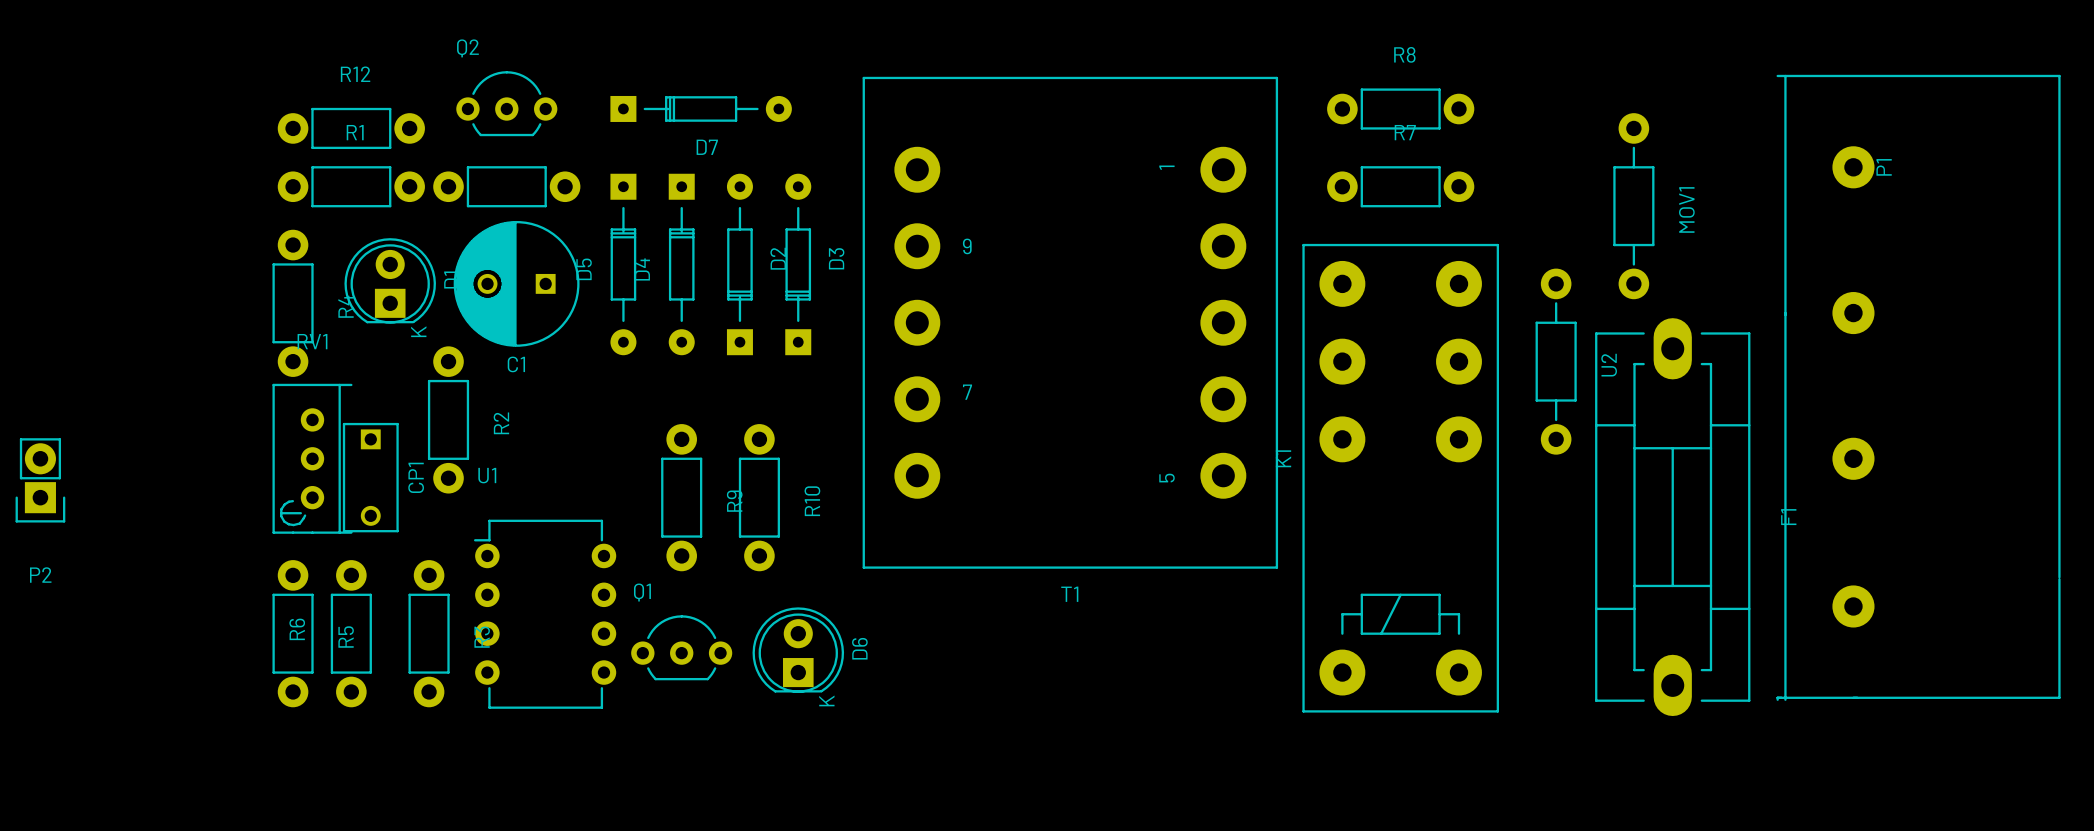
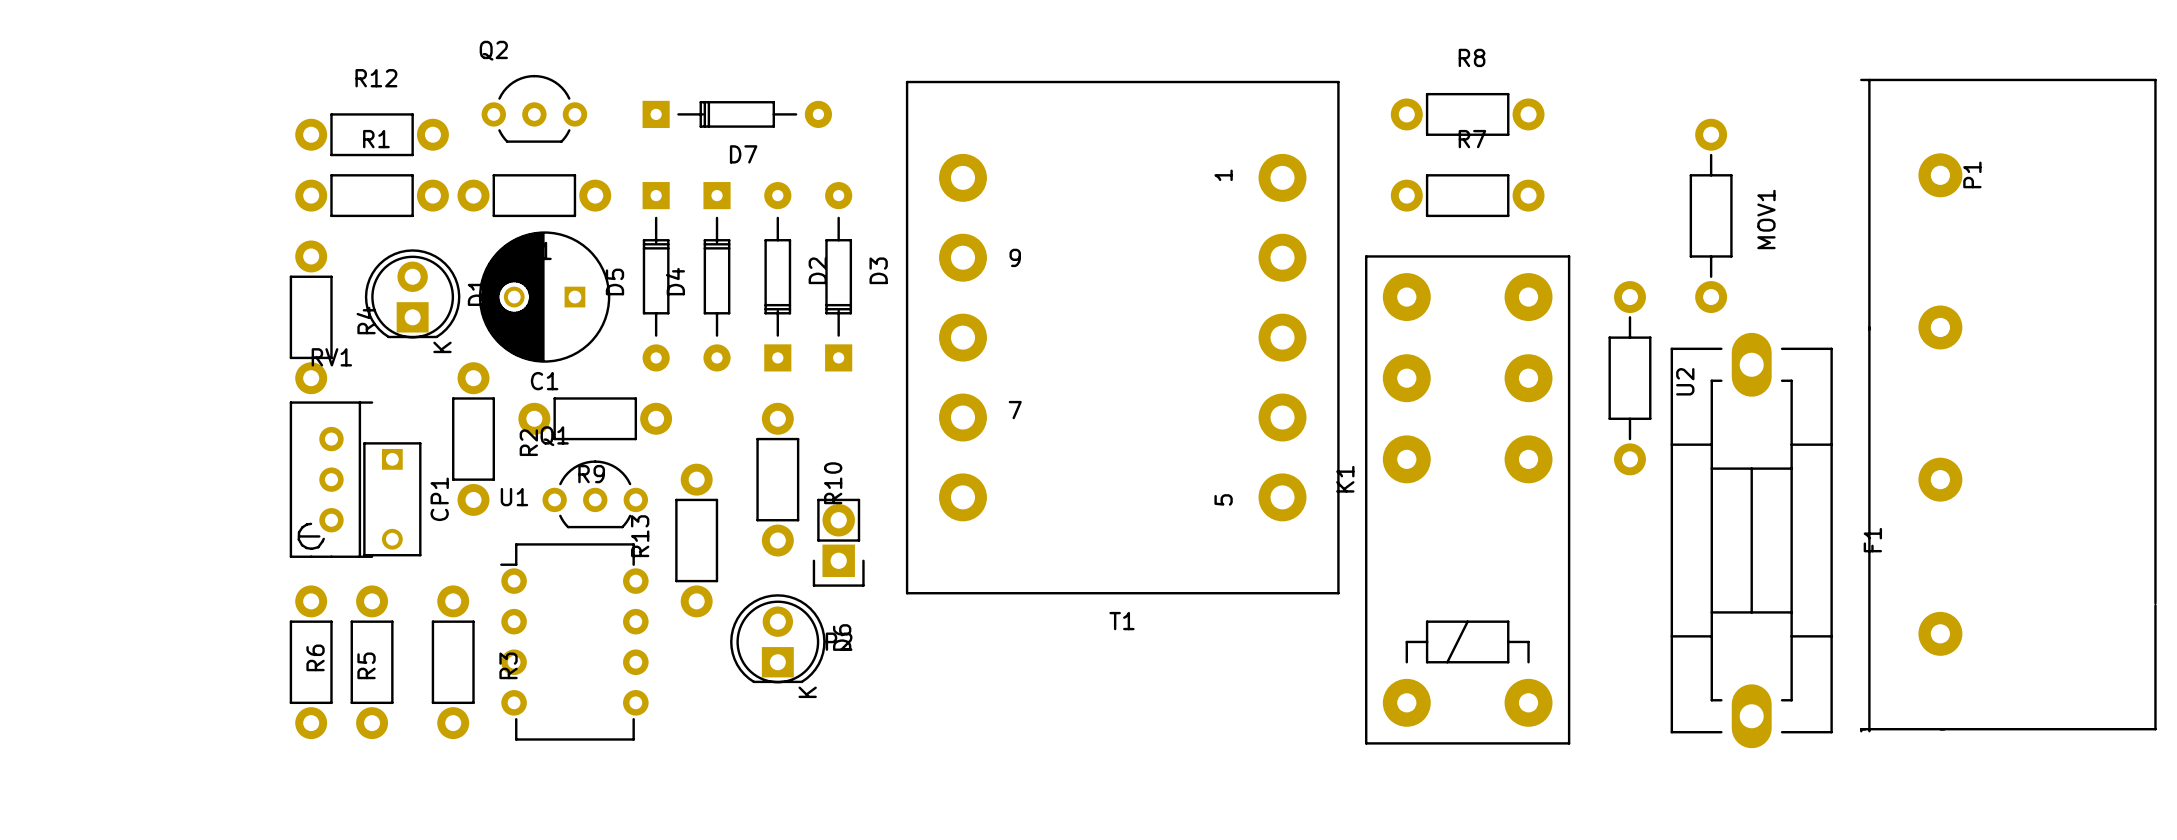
P2 position: (40, 480) -> (838, 542)
R9 rotation: 0° (681, 497) -> 90° clockwise (595, 418)
R9 position: (681, 497) -> (595, 418)
R10 position: (759, 497) -> (777, 479)
R13: none -> (696, 540)
Q1 position: (681, 647) -> (595, 494)
D6 position: (798, 650) -> (777, 638)

